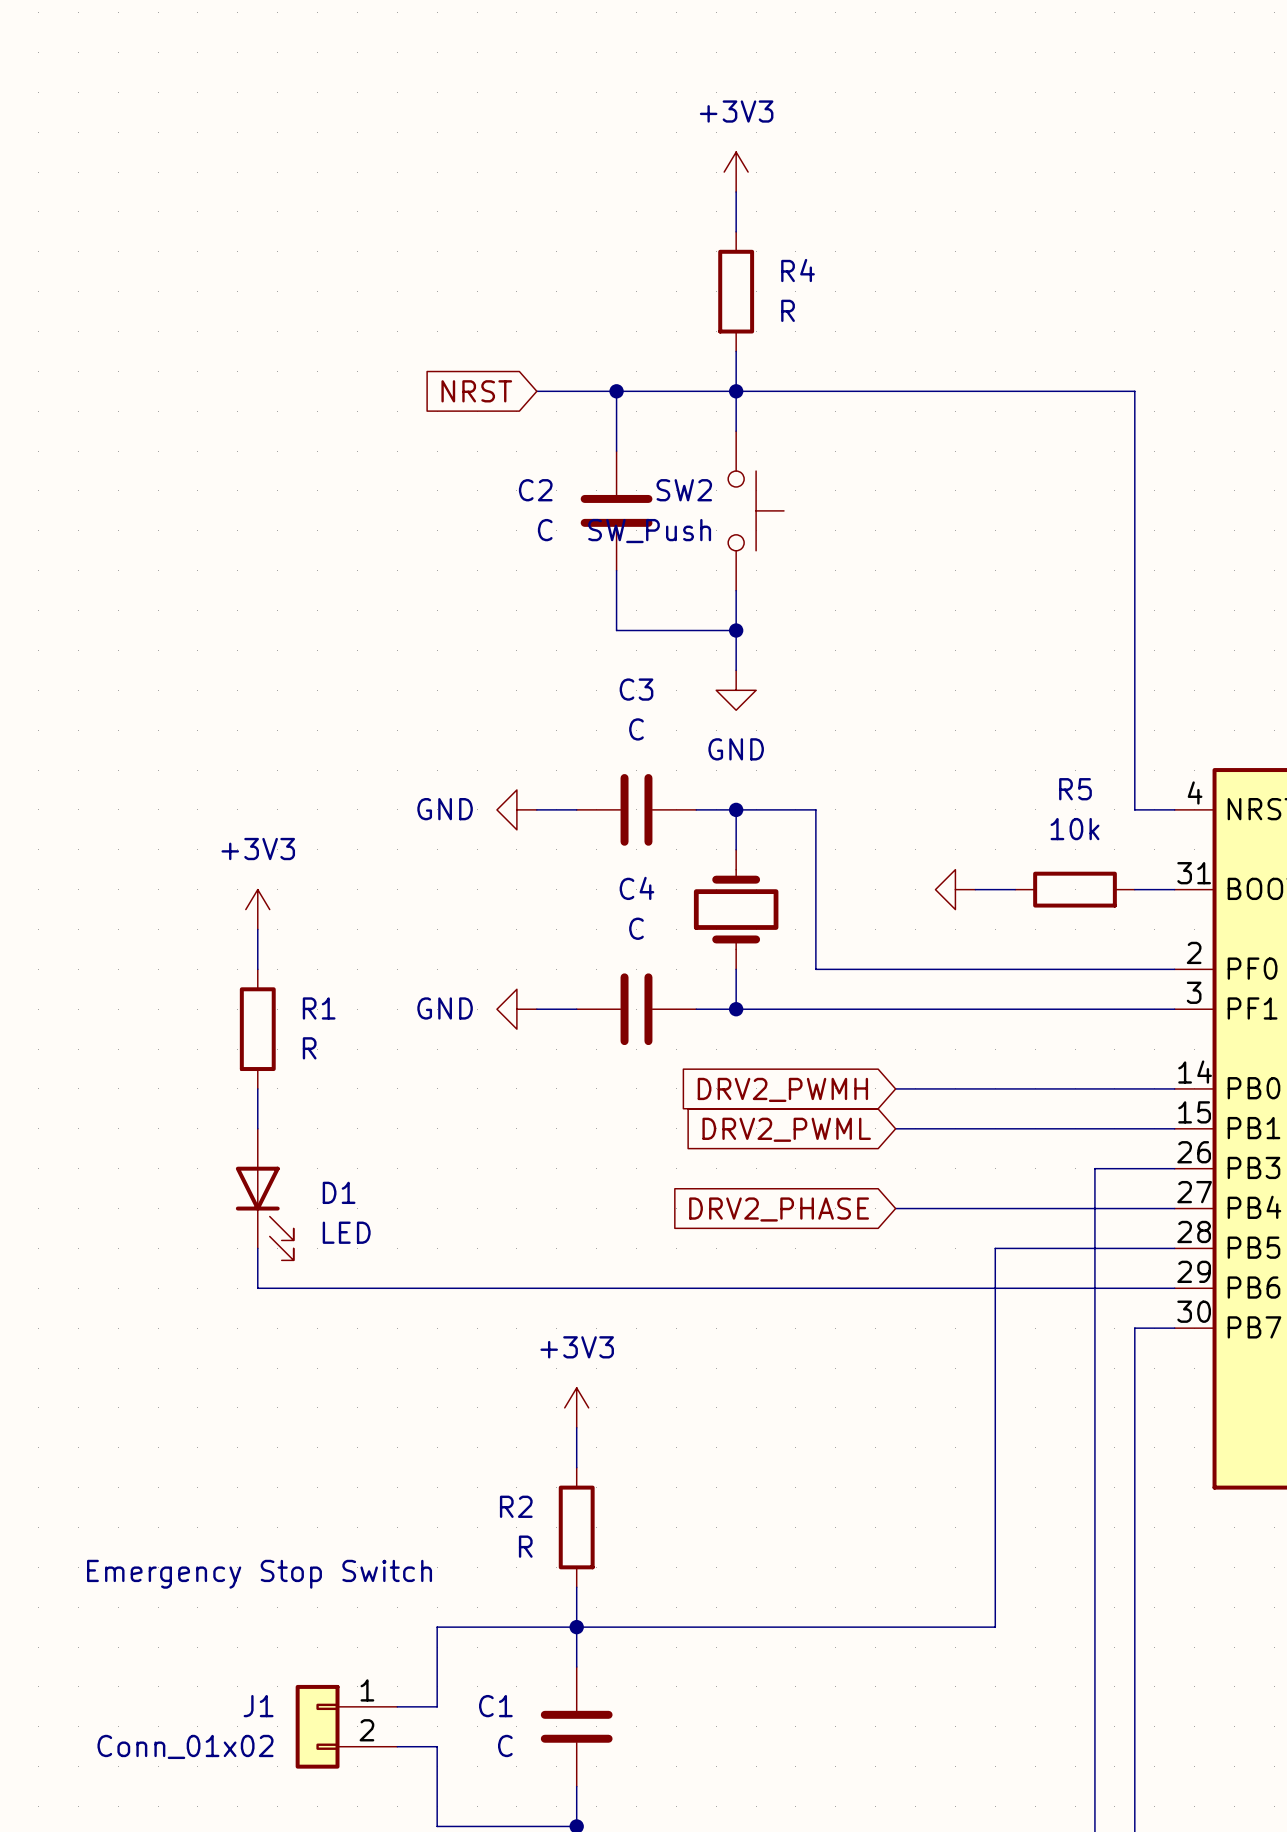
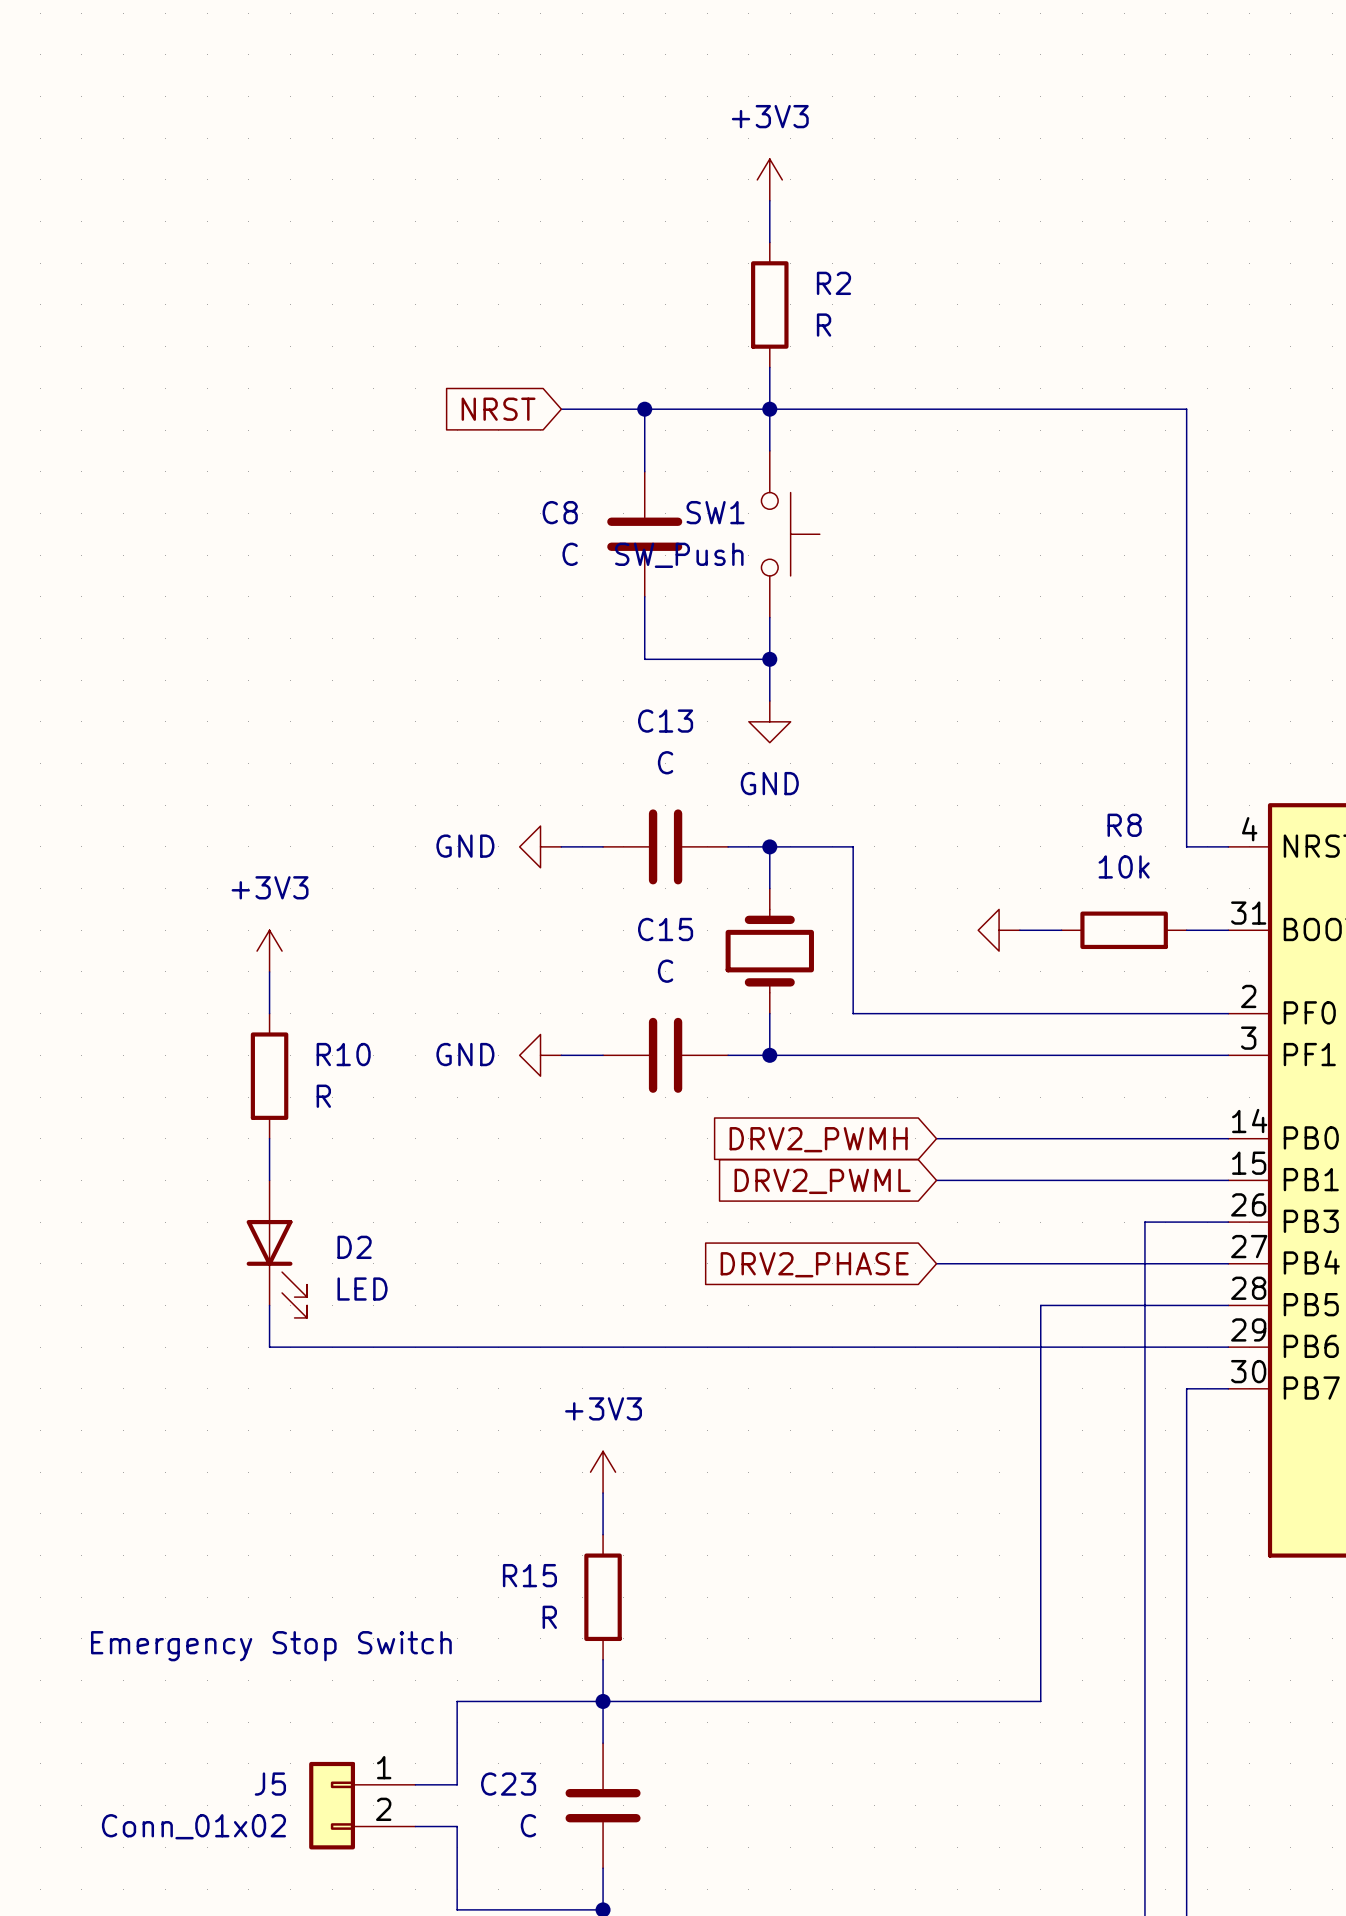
R4 name: R4 (798, 270) -> R2 (833, 283)
C2 name: C2 (535, 490) -> C8 (560, 512)
SW2 name: SW2 (684, 490) -> SW1 (715, 512)
C3 name: C3 (636, 689) -> C13 (665, 721)
R5 name: R5 (1075, 789) -> R8 (1124, 825)
C4 name: C4 (636, 888) -> C15 (665, 929)
R1 name: R1 (319, 1008) -> R10 (343, 1054)
D1 name: D1 (339, 1192) -> D2 (354, 1247)
R2 name: R2 (516, 1506) -> R15 (529, 1575)
J1 name: J1 (258, 1706) -> J5 (270, 1784)
C1 name: C1 (495, 1706) -> C23 (508, 1784)

